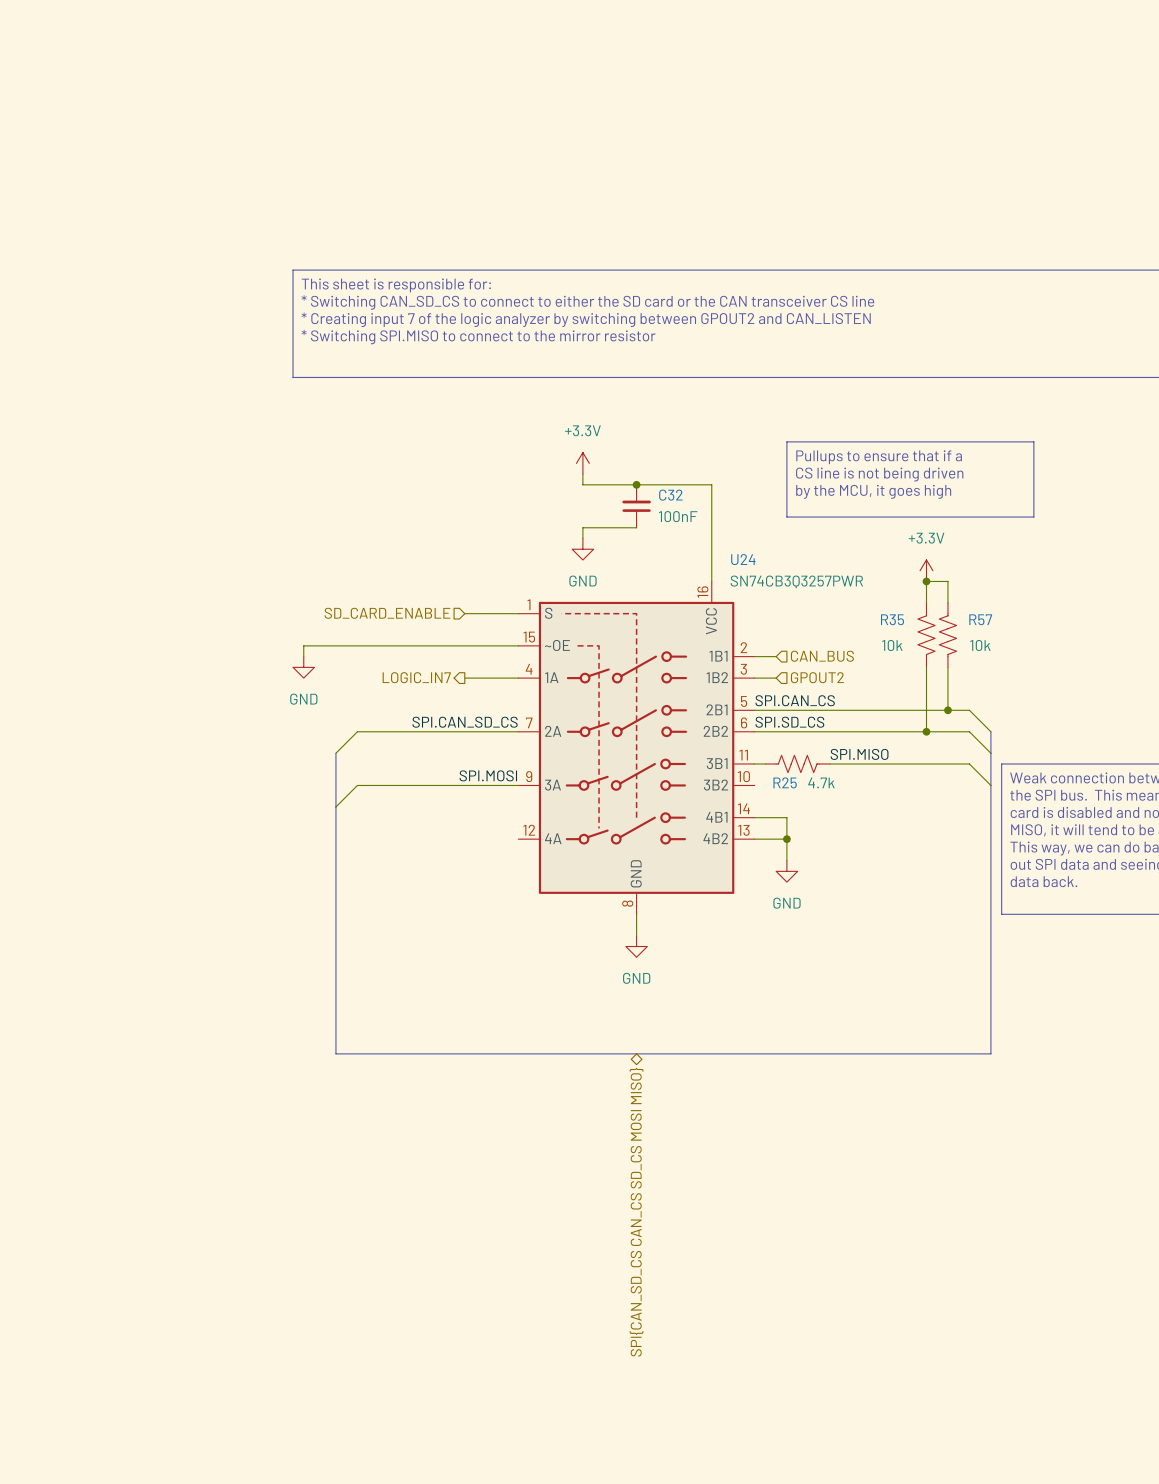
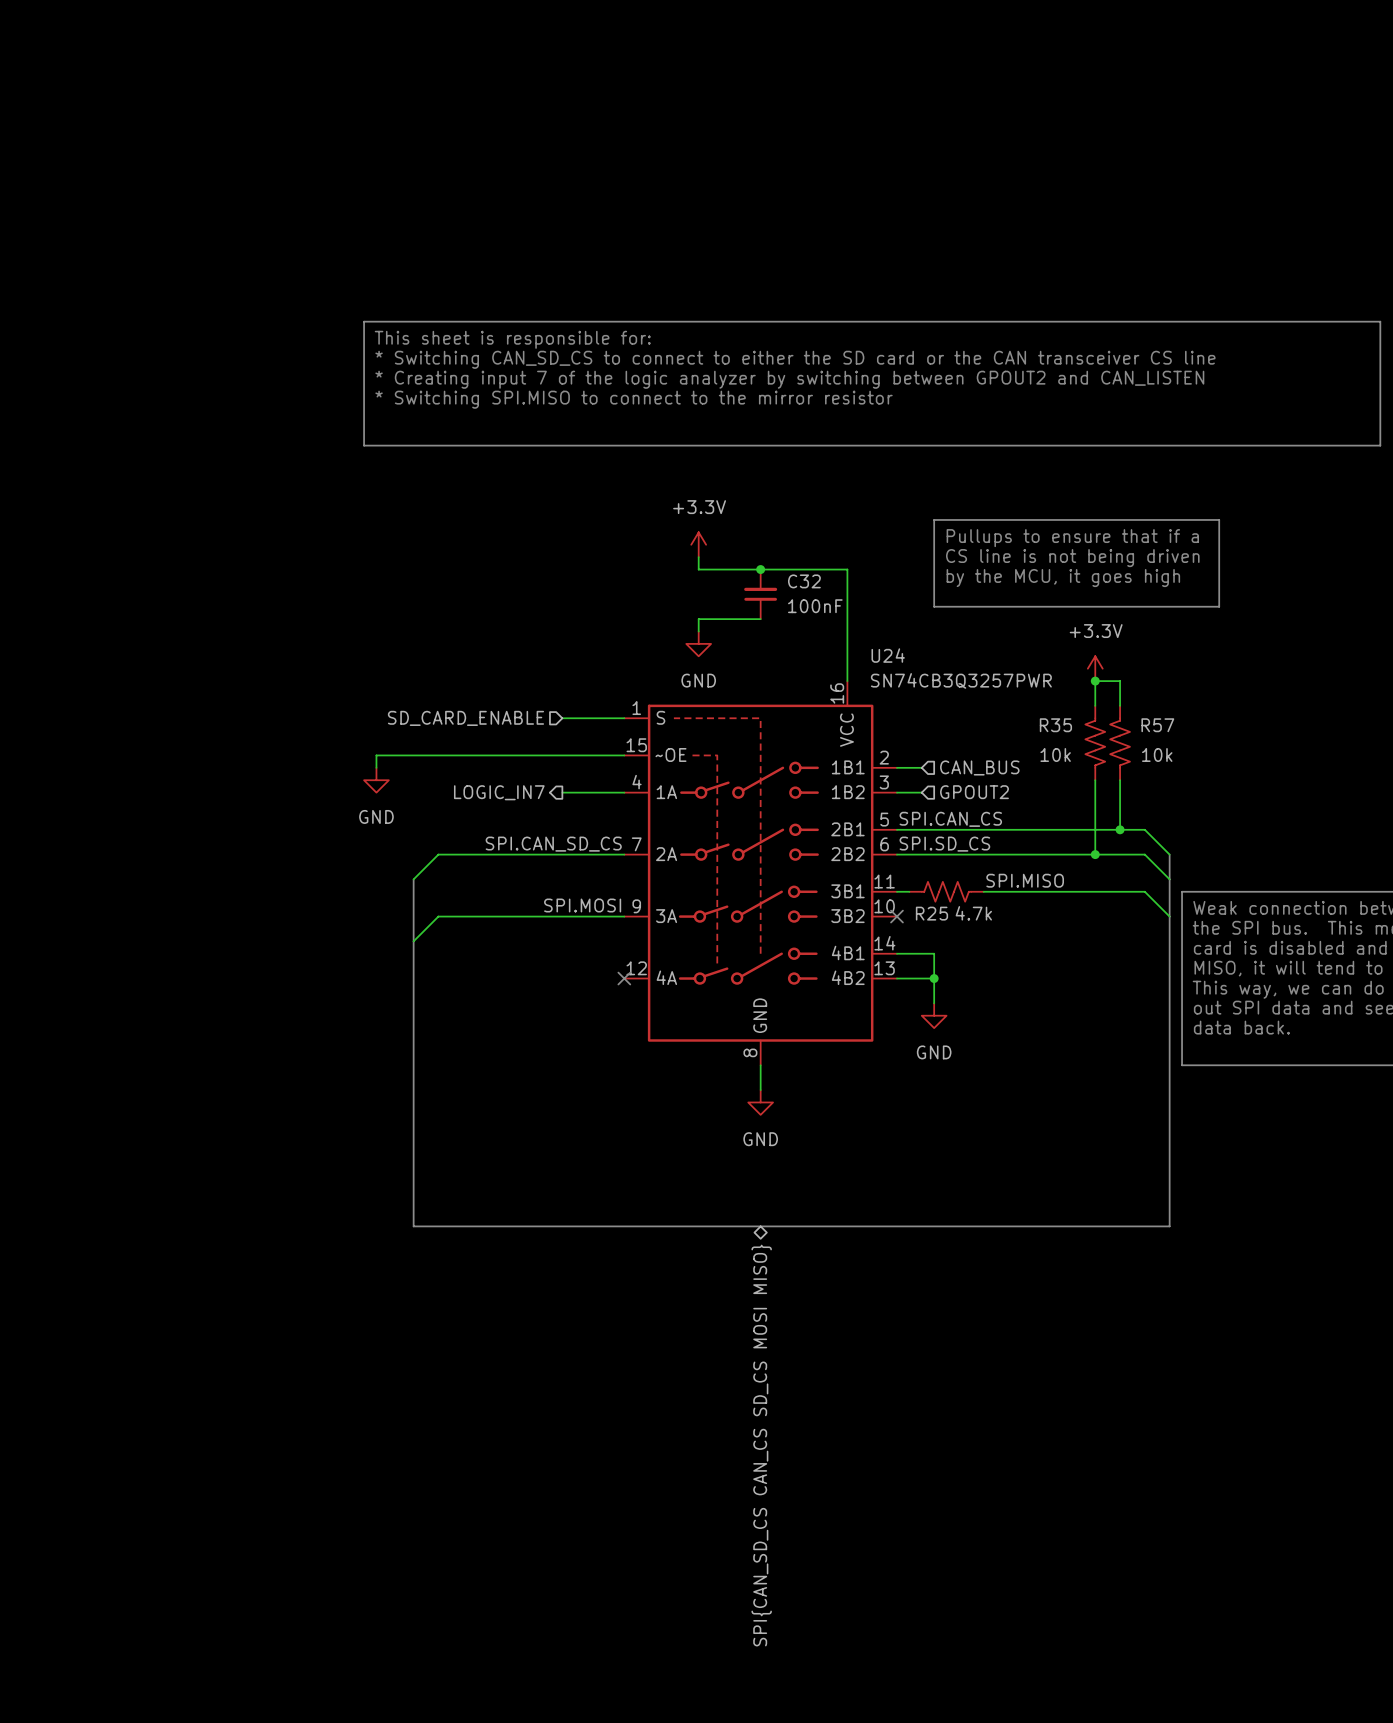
no-connect mark: none -> (896, 916)
no-connect mark: none -> (624, 978)

